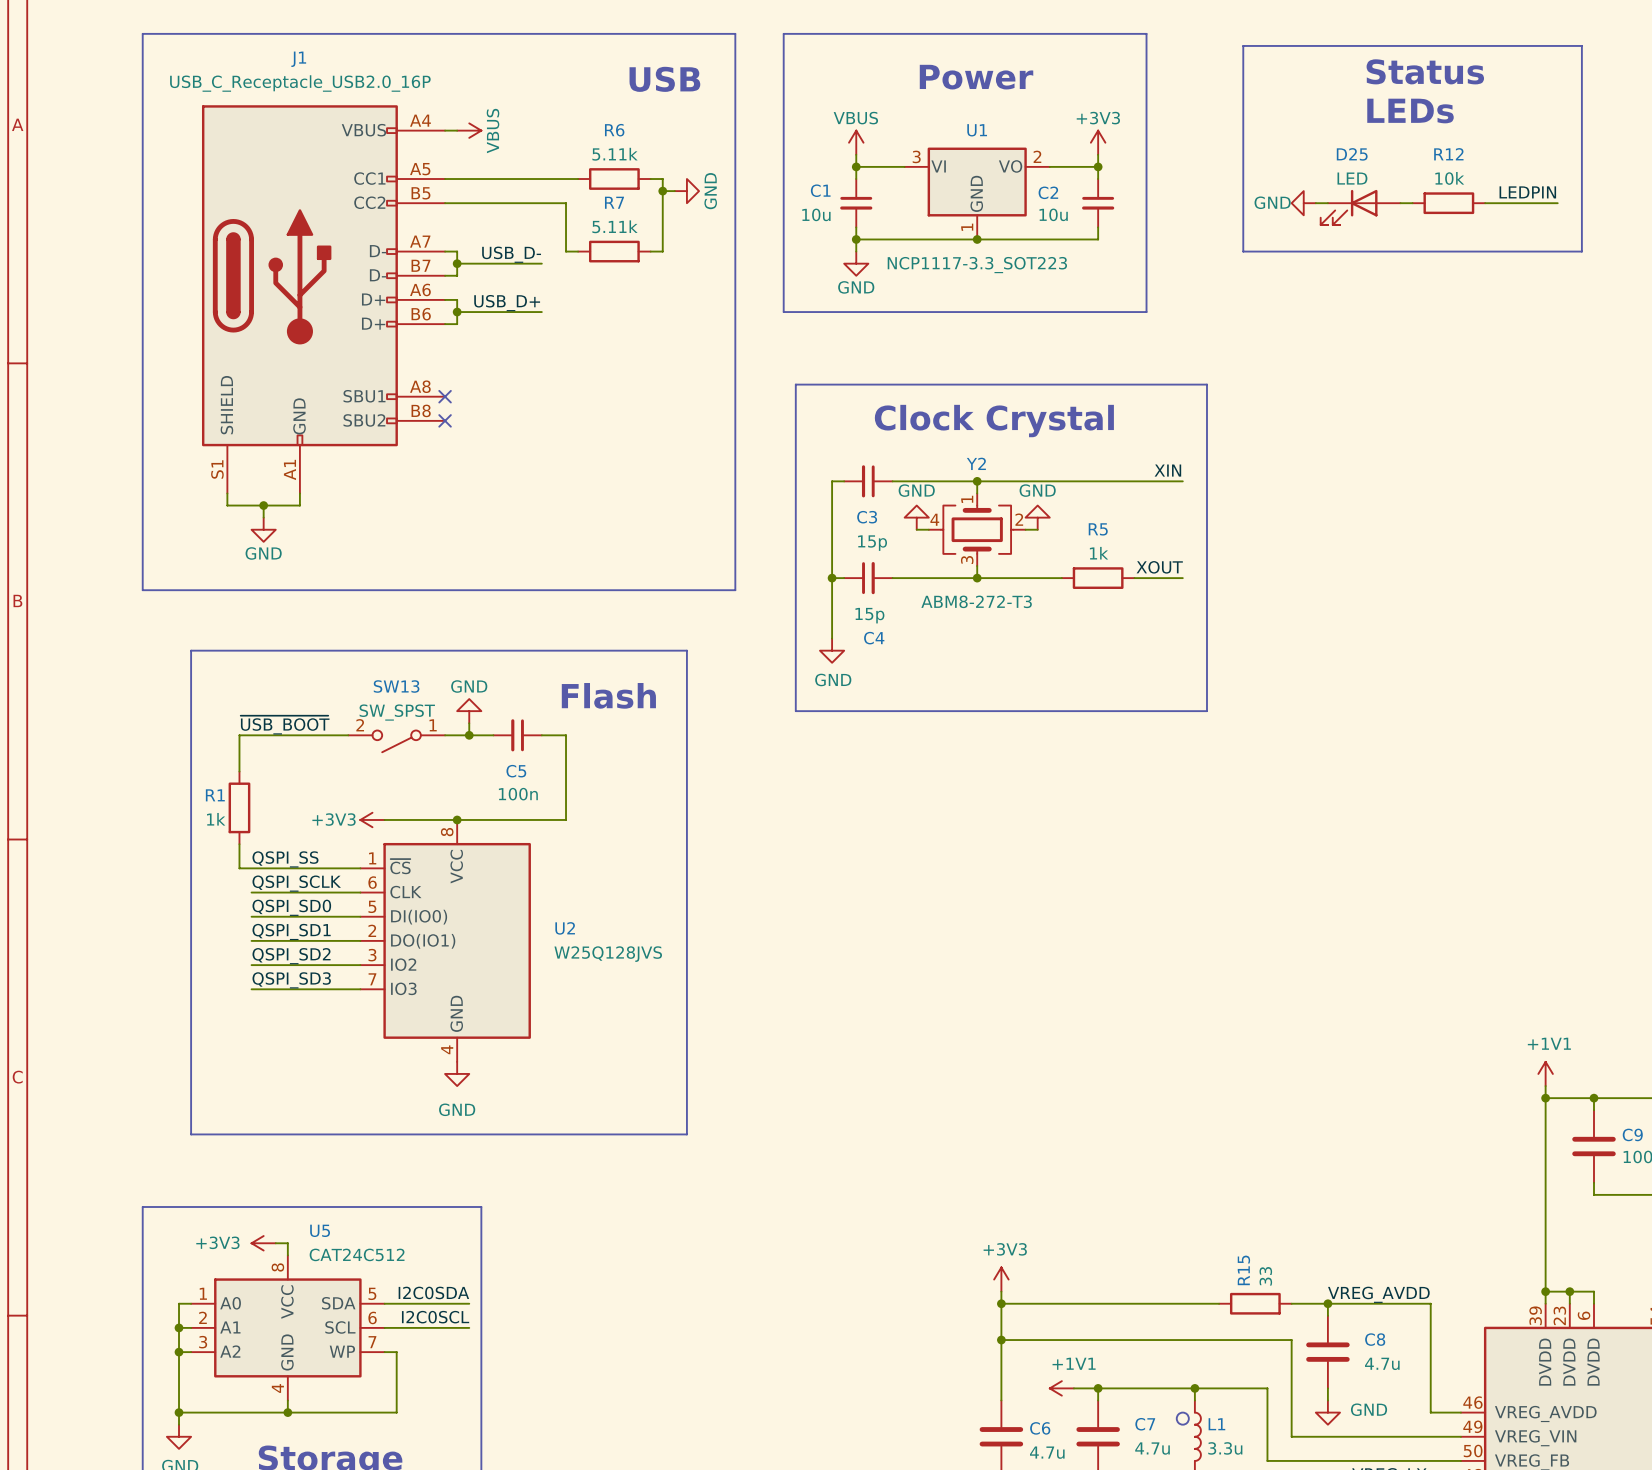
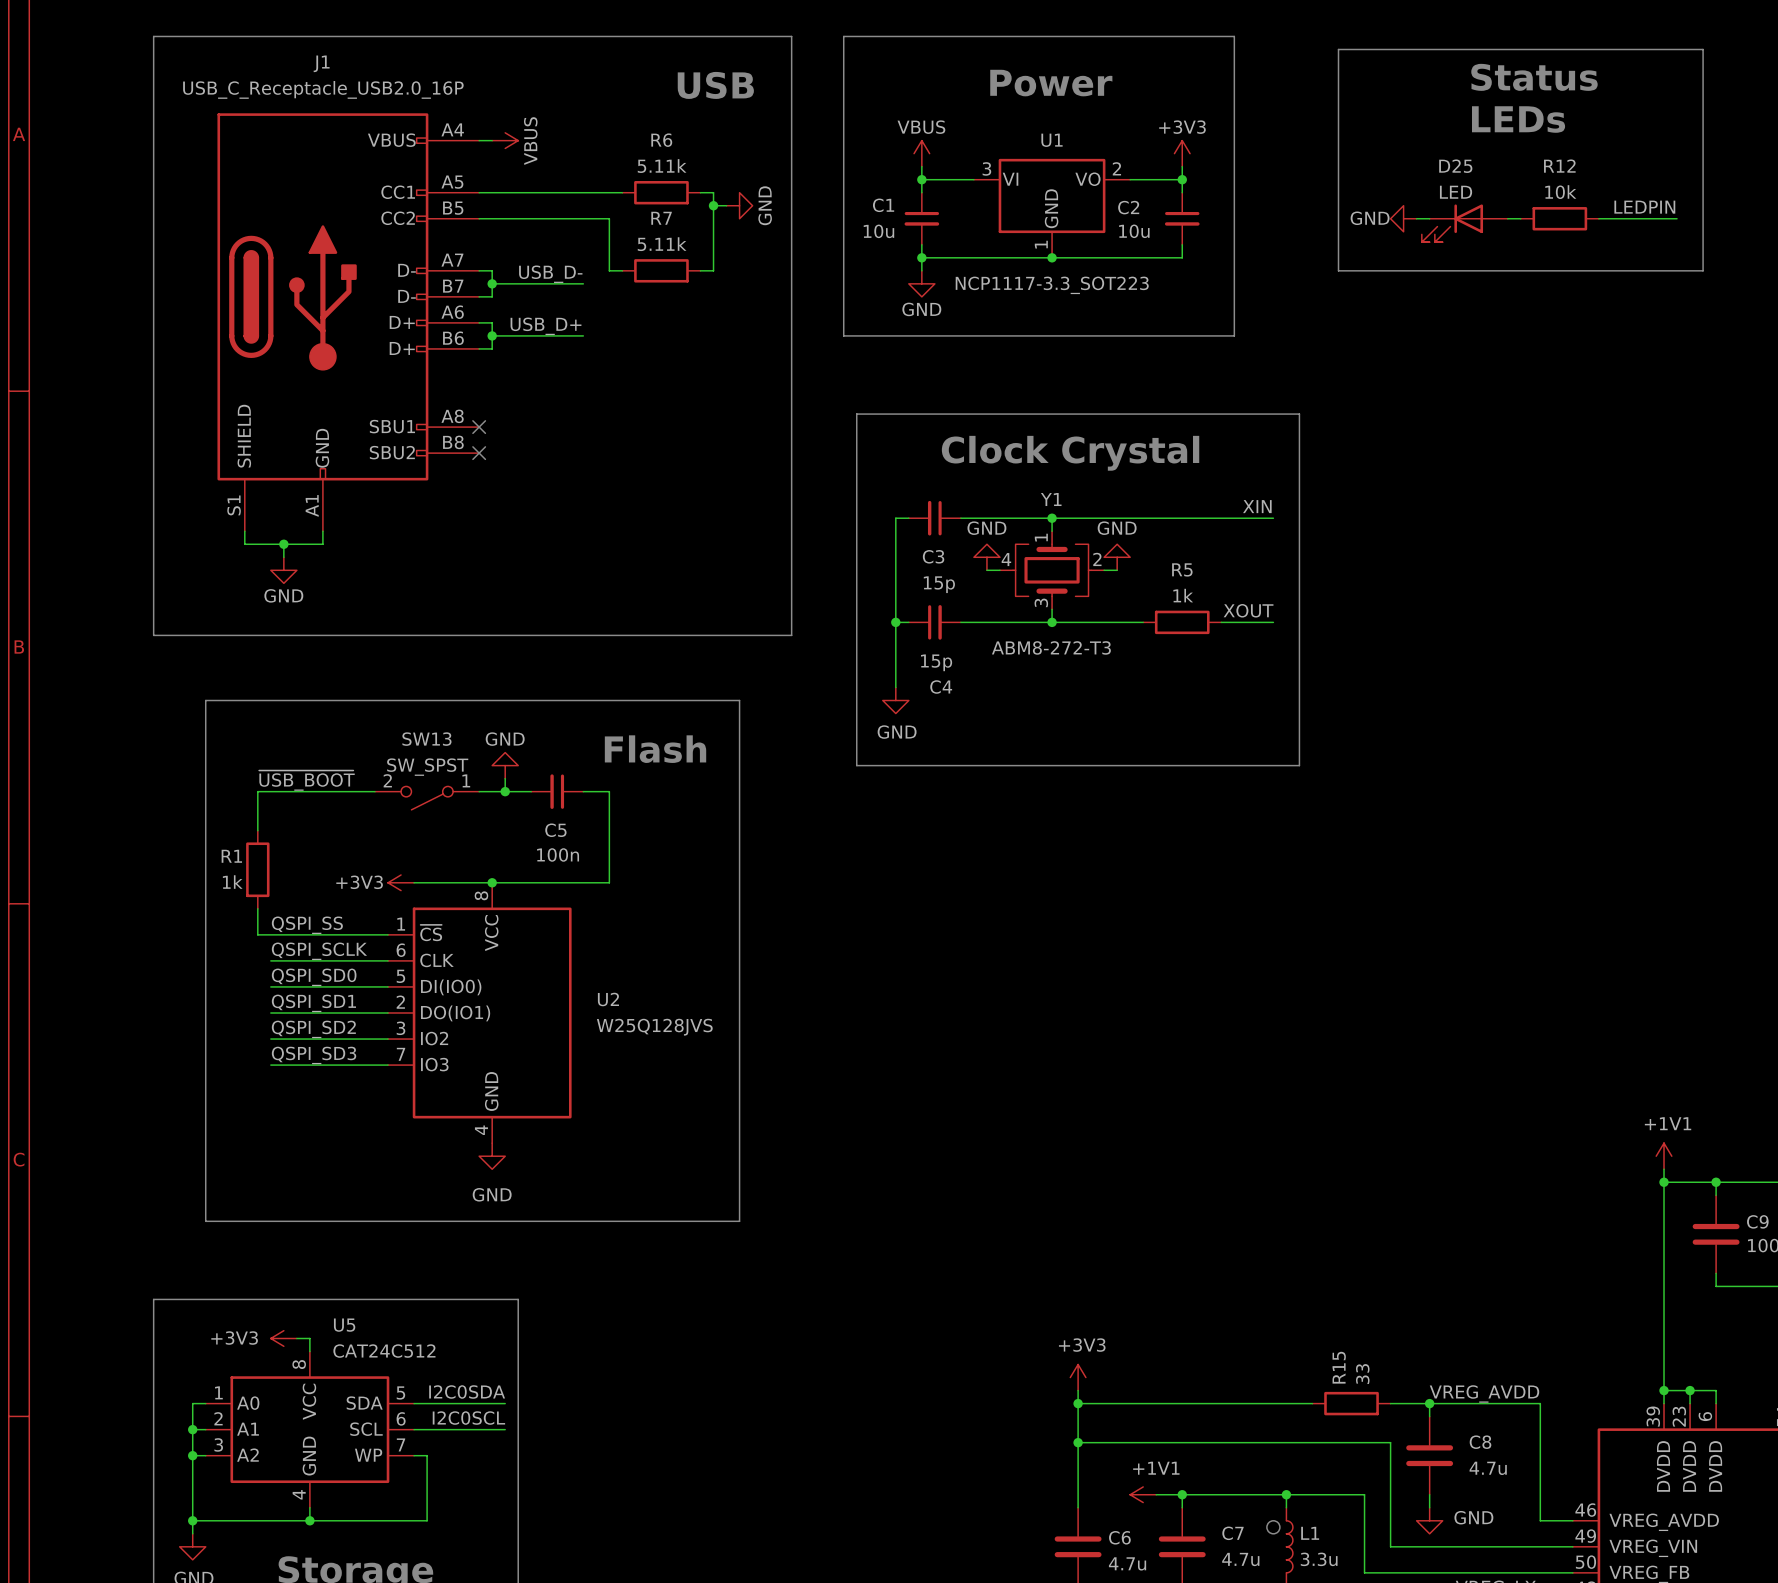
Y2 name: Y2 (976, 463) -> Y1 (1051, 499)

